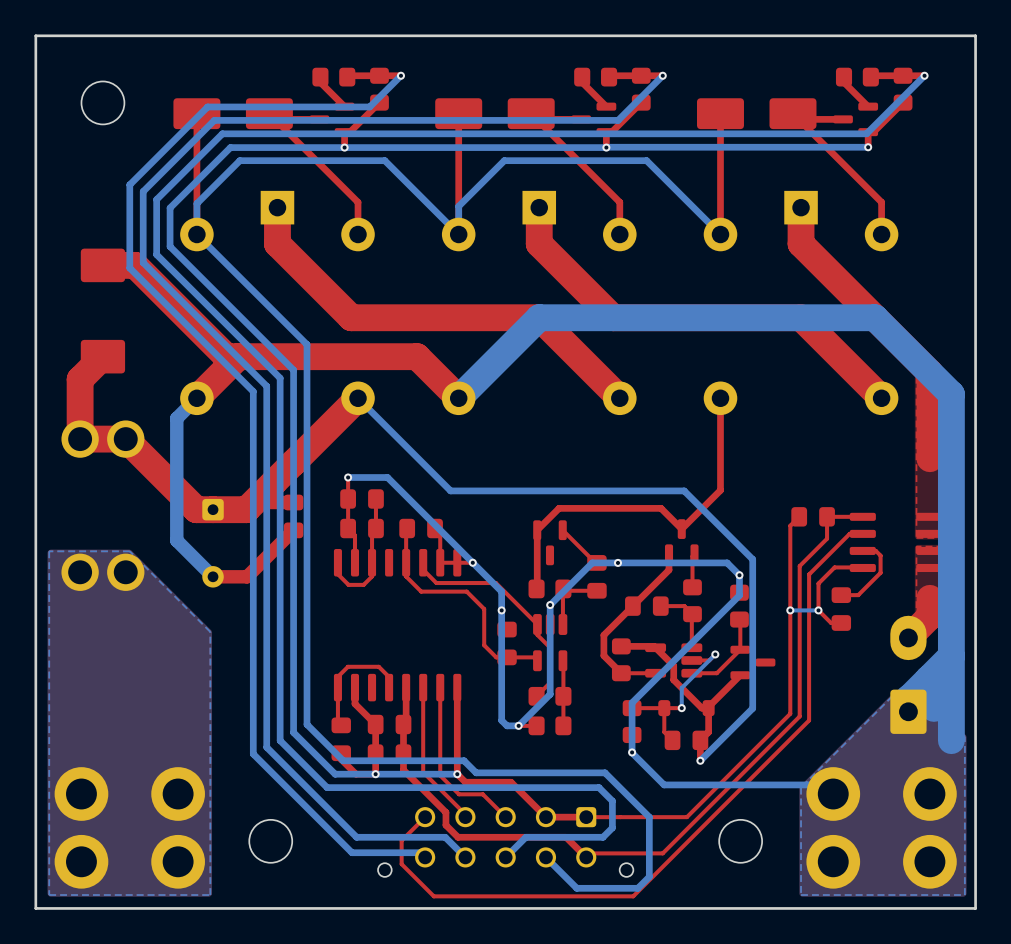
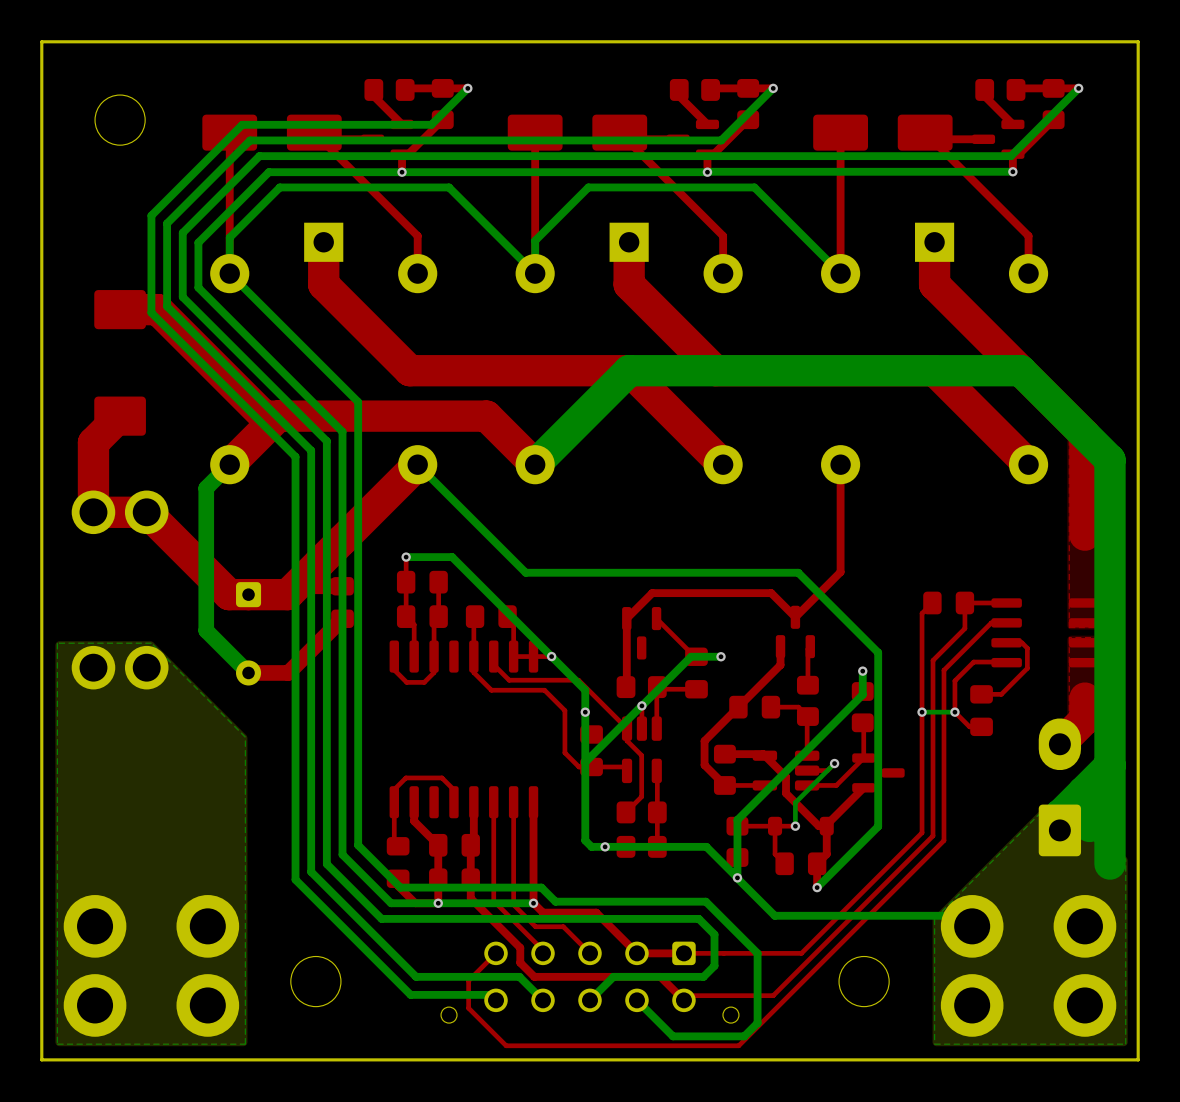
bottom track: (617, 562) (727, 562) (739, 575) -> none
bottom track: (550, 605) (550, 694) (518, 725) -> (641, 705) (585, 762)
bottom track: none -> (605, 846) (706, 846) (737, 877)

